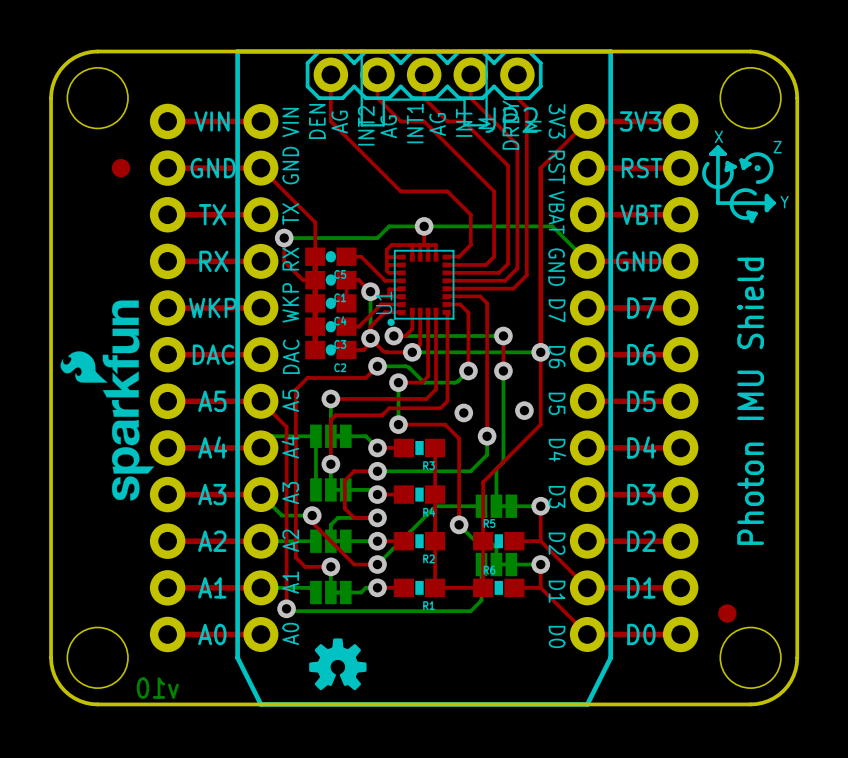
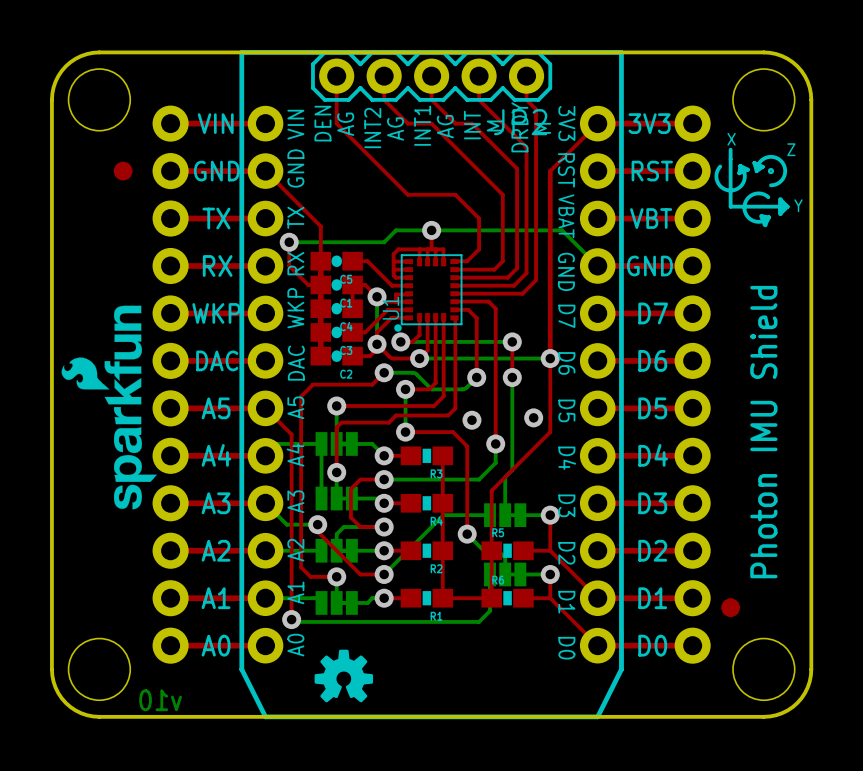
part footprint: [67, 49, 781, 707] -> [68, 50, 795, 720]
line: (717, 147) (724, 154) (710, 154) (717, 147) -> none
text position: Photon IMU Shield (750, 401) -> Photon IMU Shield (763, 432)
part position: (727, 613) -> (730, 607)

